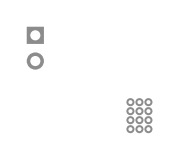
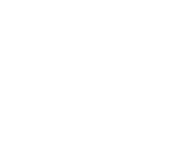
part: (35, 48) -> none
via: (130, 102) -> none
via: (139, 102) -> none
via: (148, 102) -> none
via: (130, 111) -> none
via: (139, 111) -> none
via: (148, 111) -> none
via: (130, 120) -> none
via: (139, 120) -> none
via: (148, 120) -> none
via: (130, 129) -> none
via: (139, 129) -> none
via: (148, 129) -> none

